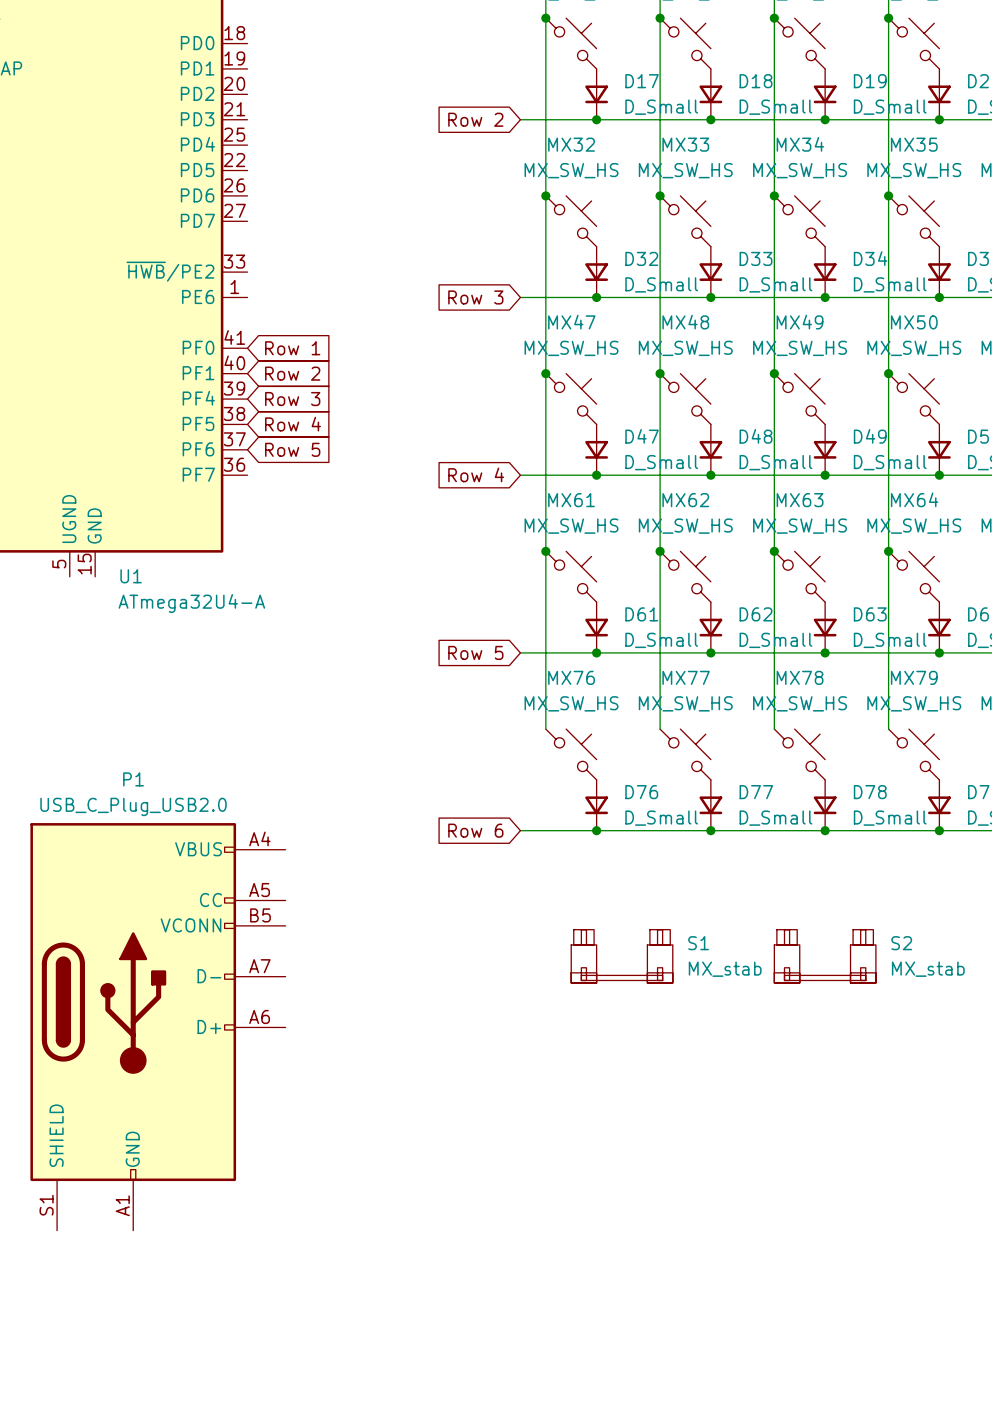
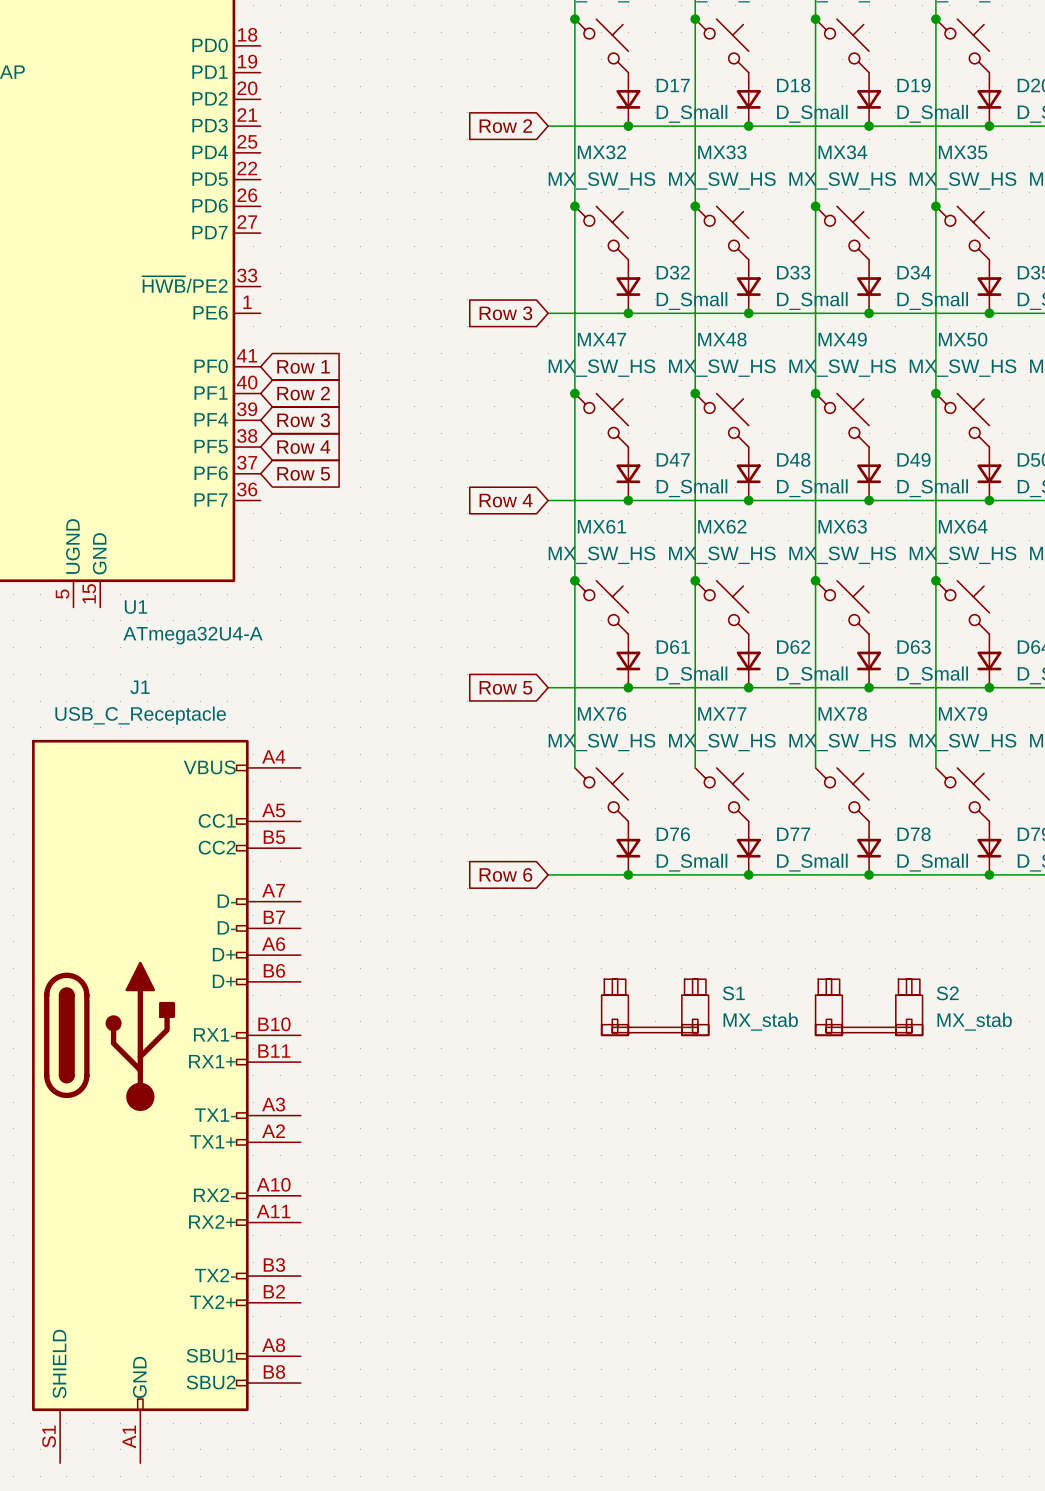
P1: USB_C_Plug_USB2.0 (157, 1026) -> none
J1: none -> USB_C_Receptacle (166, 1101)

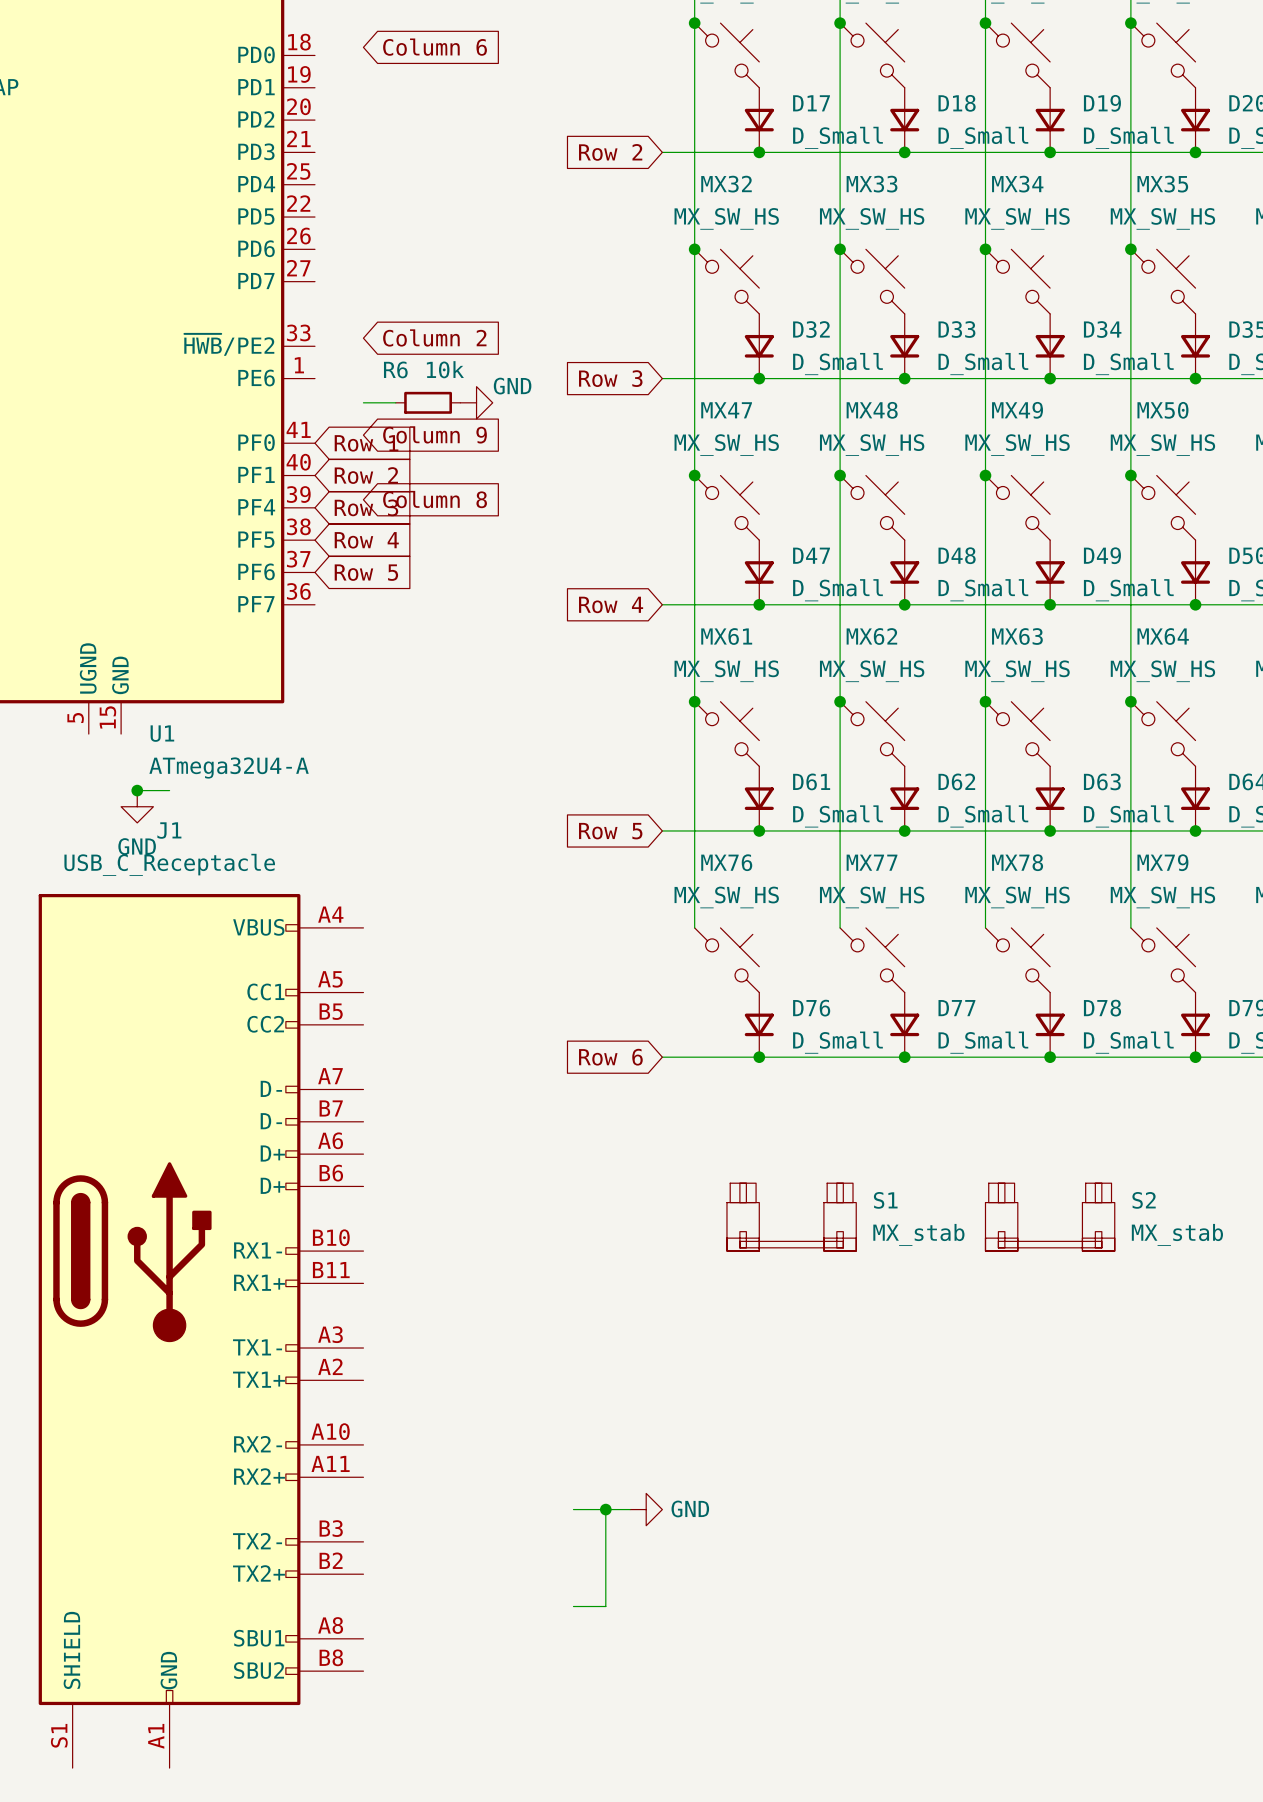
global label: none -> Column 6 (435, 47)
global label: none -> Column 2 (434, 337)
wire: none -> (363, 402) (395, 402)
R6: none -> 10k (428, 402)
power symbol: none -> GND (476, 402)
global label: none -> Column 9 (434, 434)
global label: none -> Column 8 (435, 499)
wire: none -> (137, 790) (169, 790)
junction: none -> (137, 790)
power symbol: none -> GND (137, 806)
wire: none -> (573, 1509) (630, 1509)
wire: none -> (605, 1509) (605, 1606) (573, 1606)
junction: none -> (605, 1509)
power symbol: none -> GND (646, 1509)

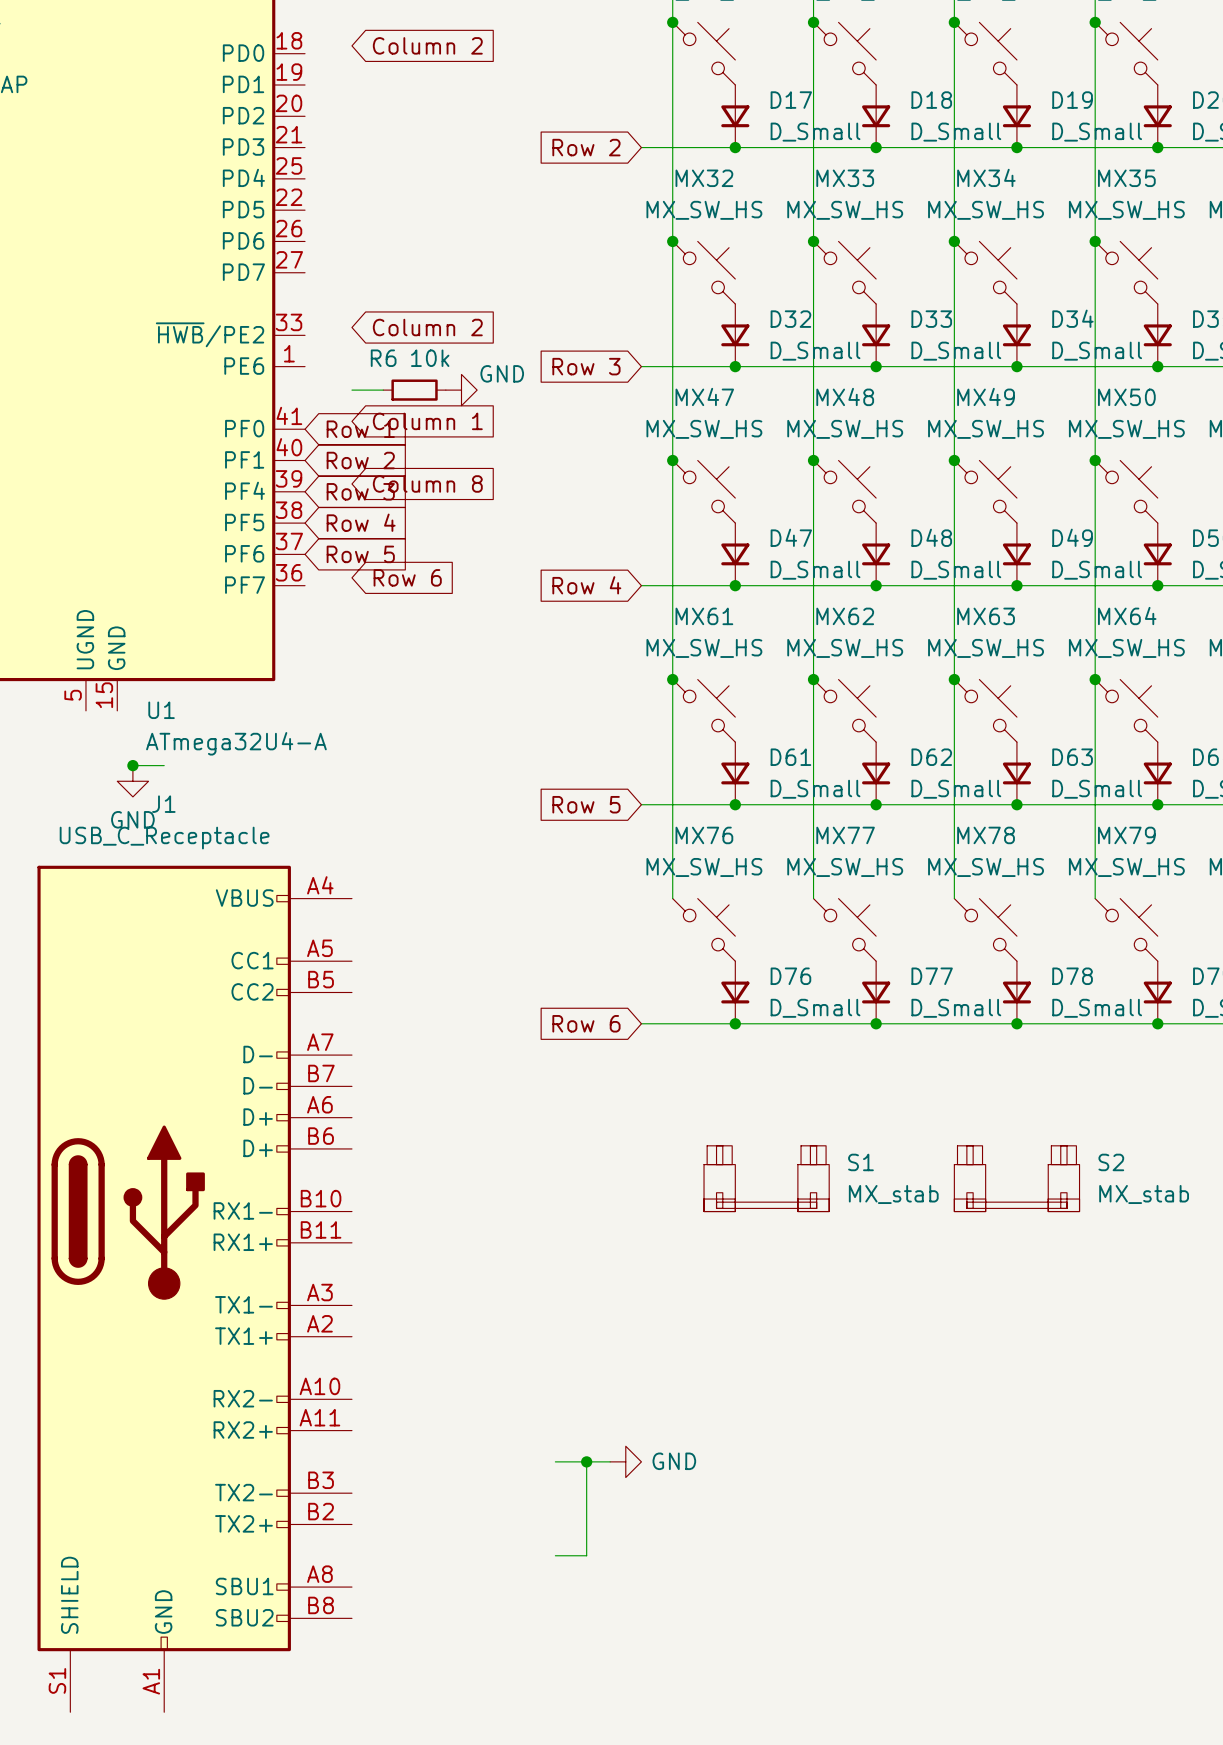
global label: Column 6 (435, 47) -> Column 2 (427, 45)
global label: Column 9 (434, 434) -> Column 1 (427, 421)
global label: none -> Row 6 (407, 577)

